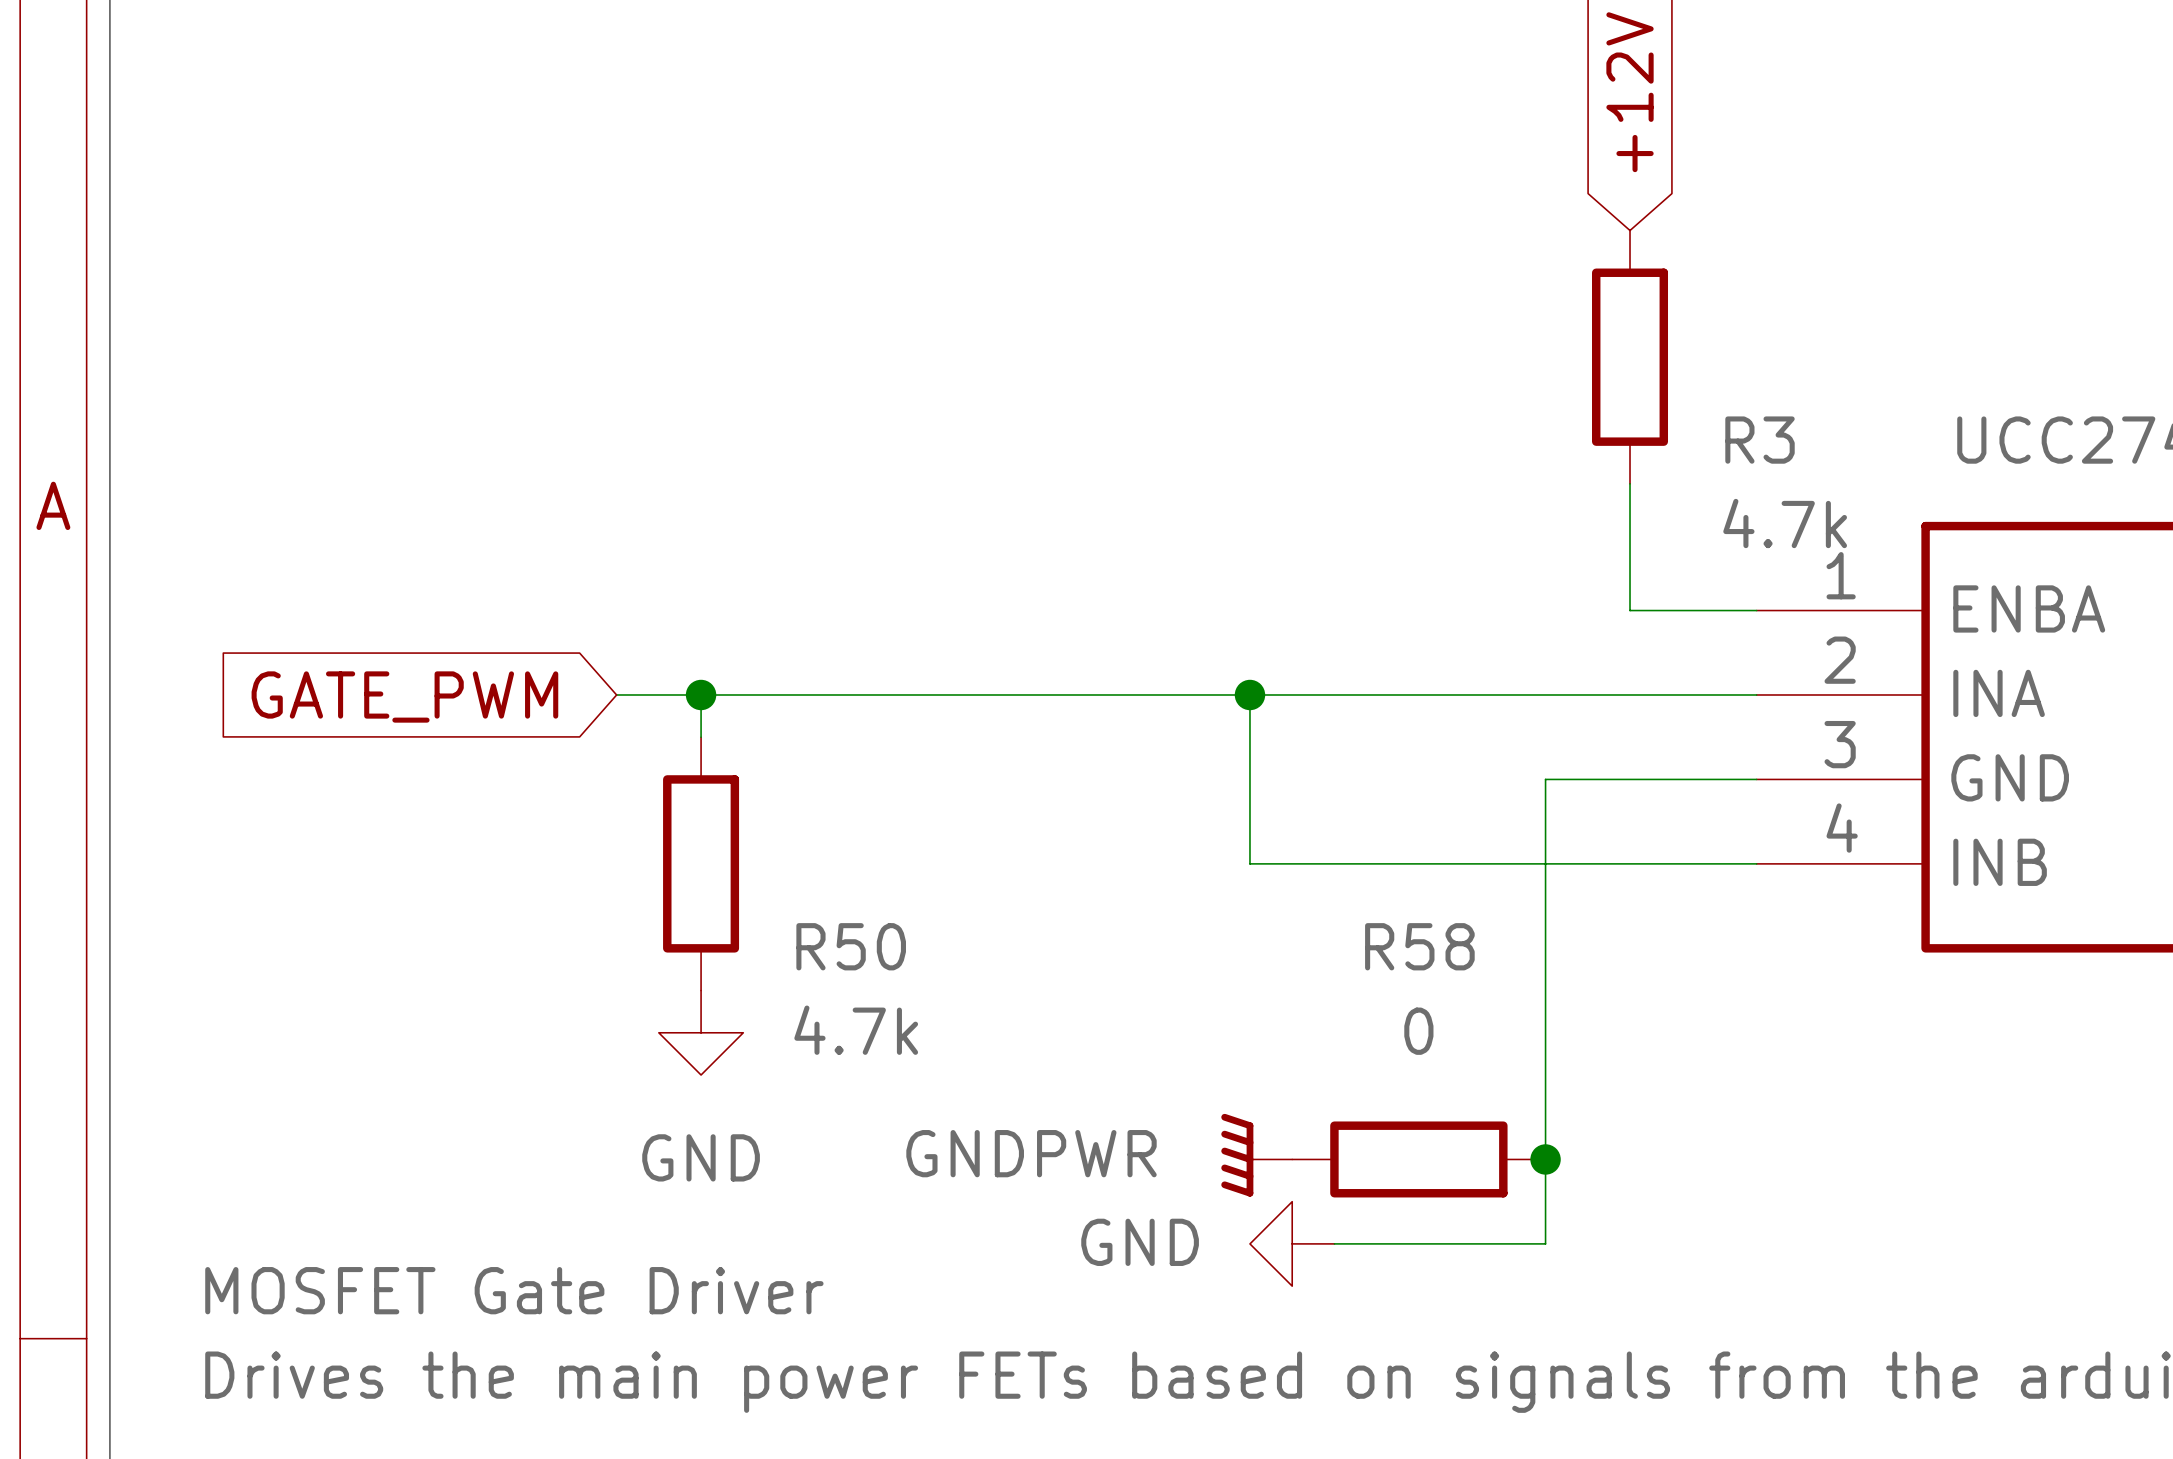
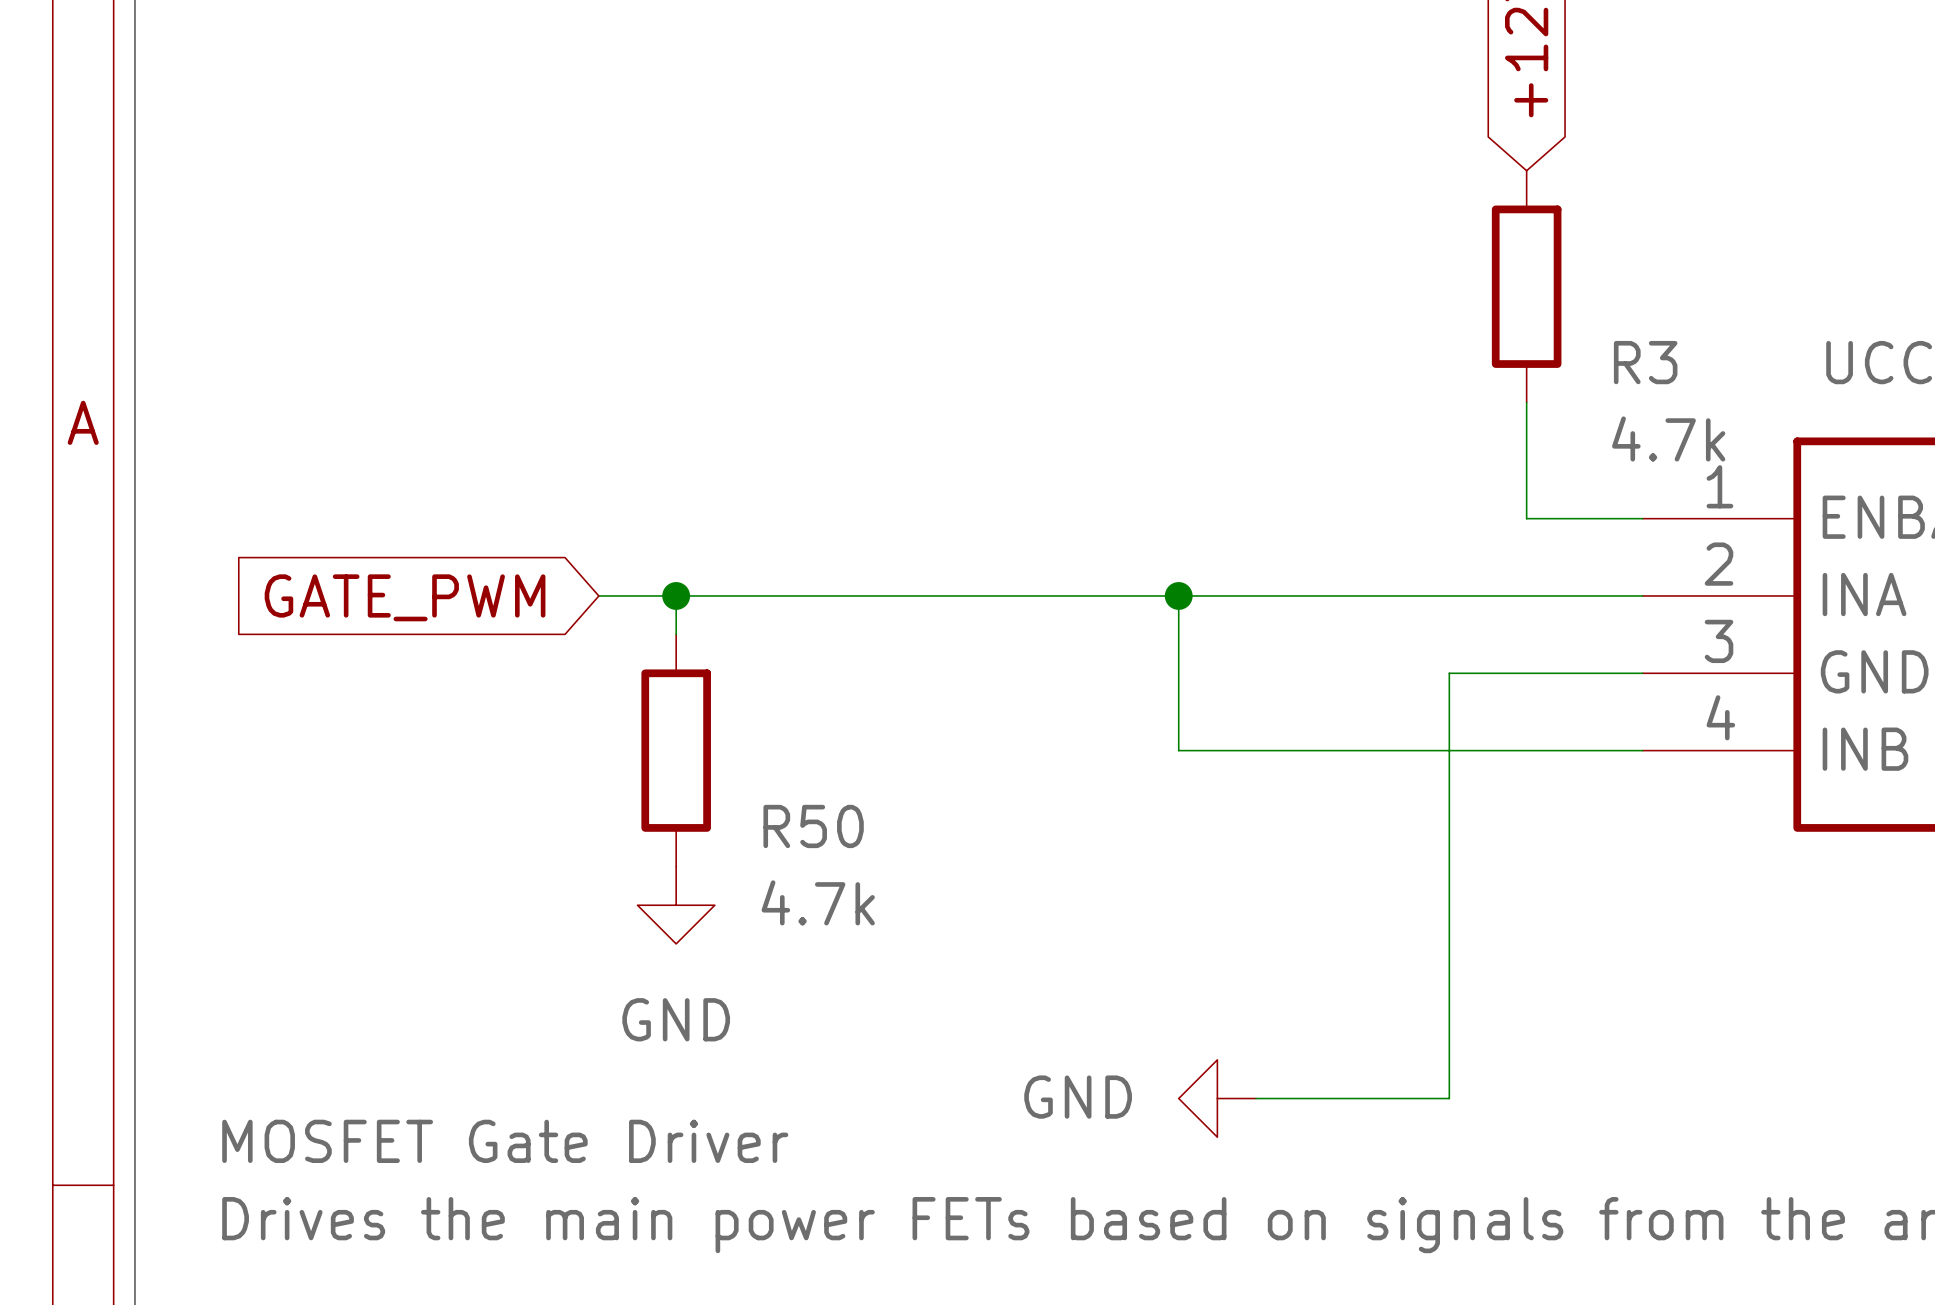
power symbol: GNDPWR (1256, 1155) -> none
R58: 0 (1418, 1159) -> none
junction: (1545, 1159) -> none

